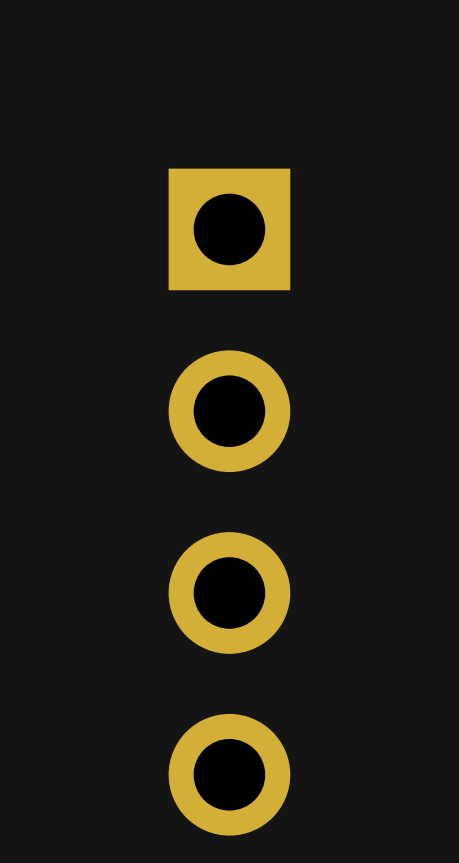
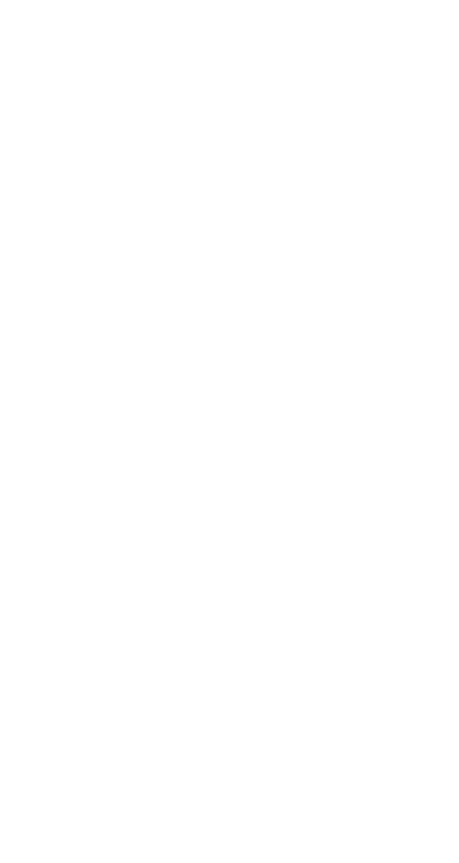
part: (229, 502) -> none

